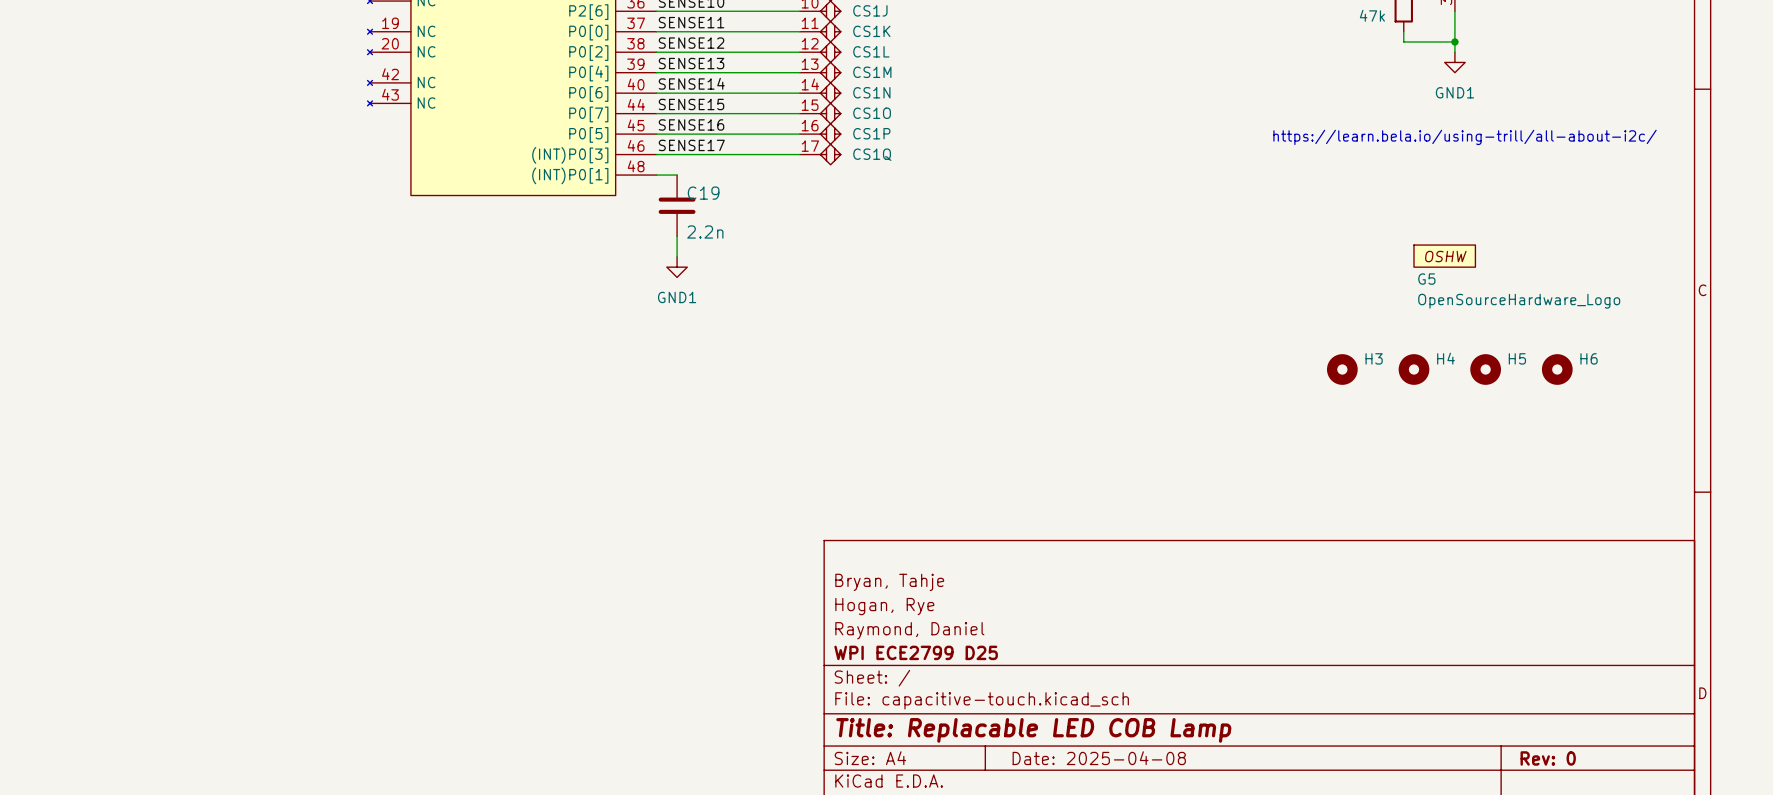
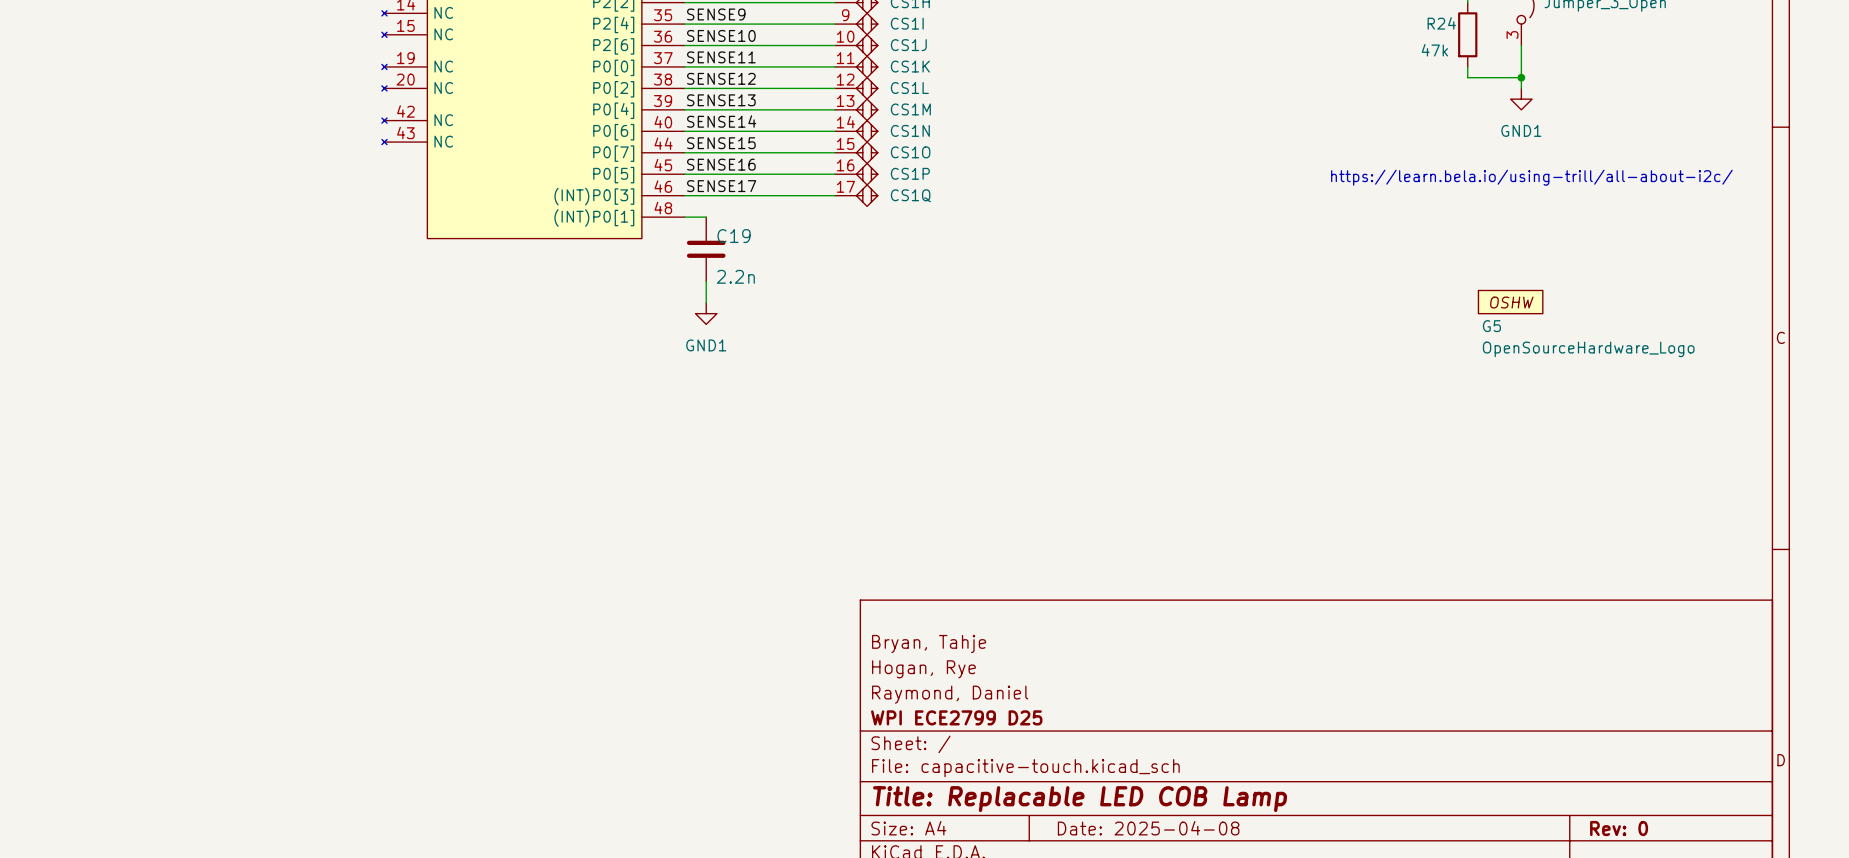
H3: (1342, 369) -> none
H4: (1414, 369) -> none
H5: (1485, 369) -> none
H6: (1557, 369) -> none

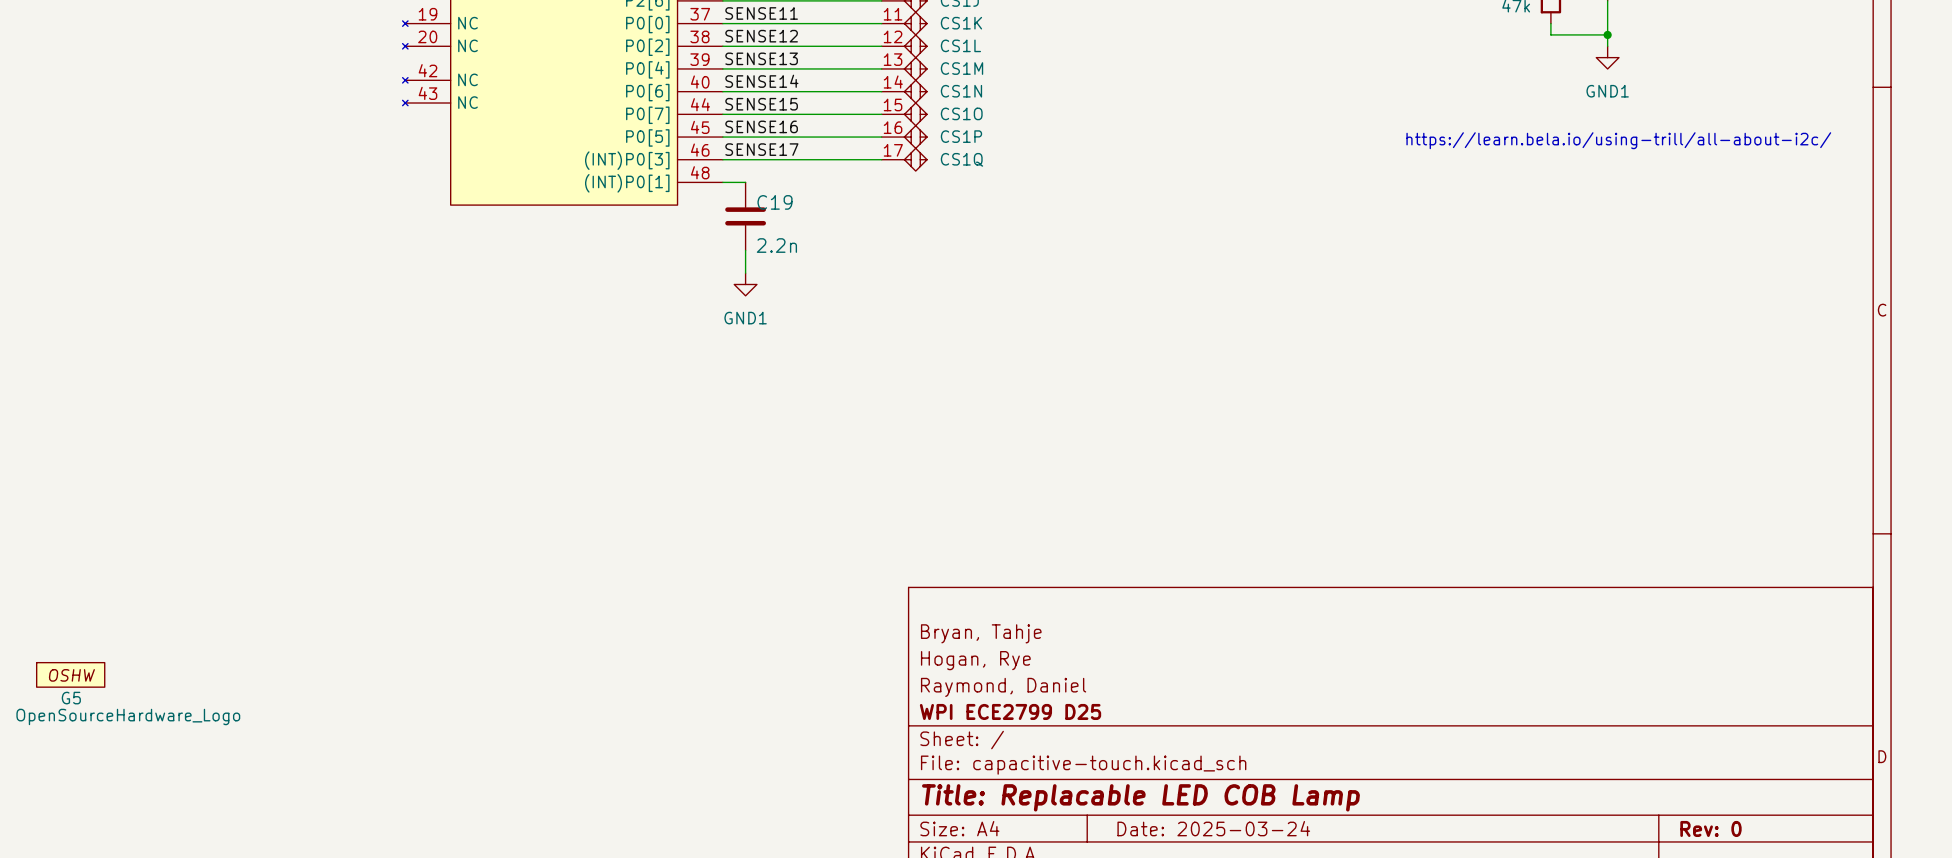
G5 position: (1510, 302) -> (70, 674)
G5 name position: G5 (1491, 326) -> G5 (71, 698)
G5 value position: OpenSourceHardware_Logo (1588, 349) -> OpenSourceHardware_Logo (128, 716)
title block: Date: 2025-04-08 (1148, 828) -> Date: 2025-03-24 (1213, 828)

